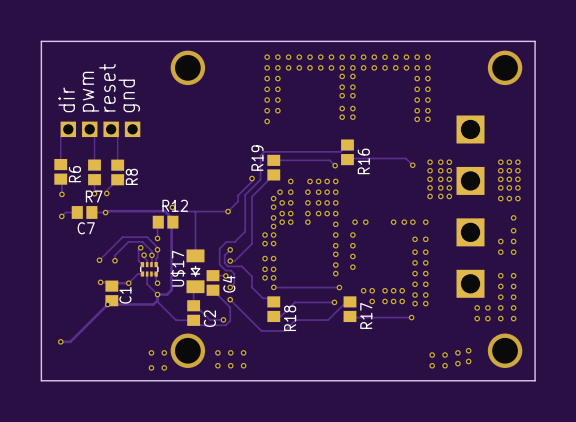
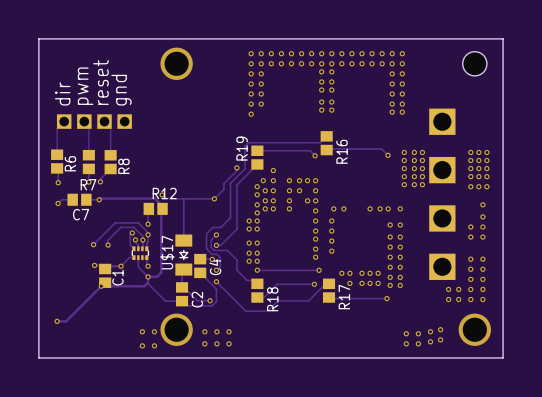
via: (505, 67) -> none
hole: none -> (474, 63)
via: (310, 181) -> none
via: (318, 181) -> none
via: (327, 181) -> none
via: (335, 181) -> none
via: (327, 202) -> none
via: (318, 213) -> none

